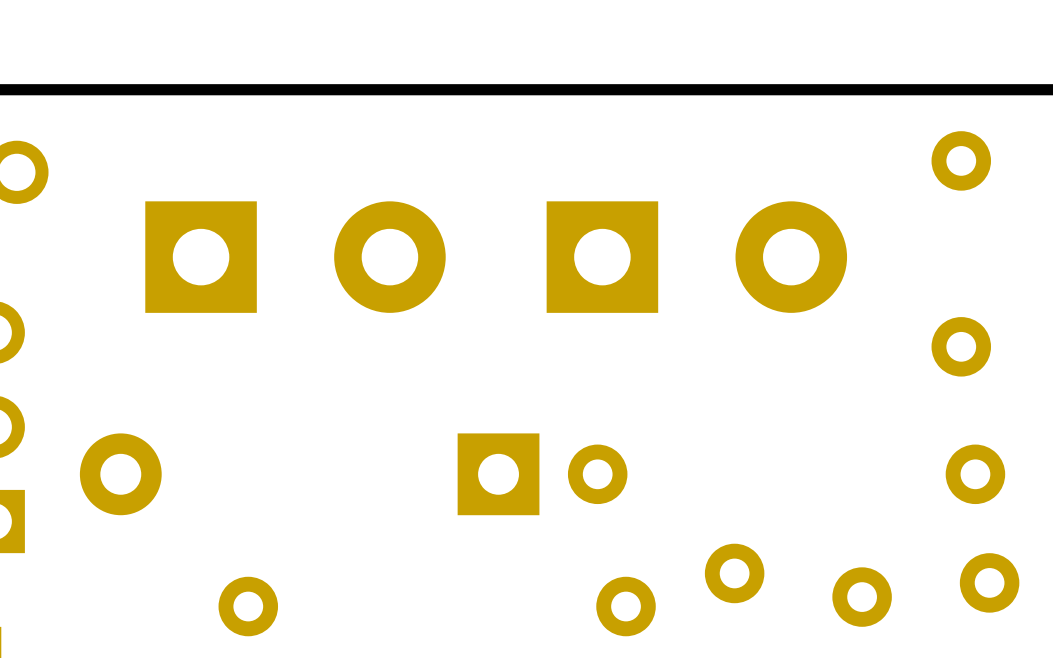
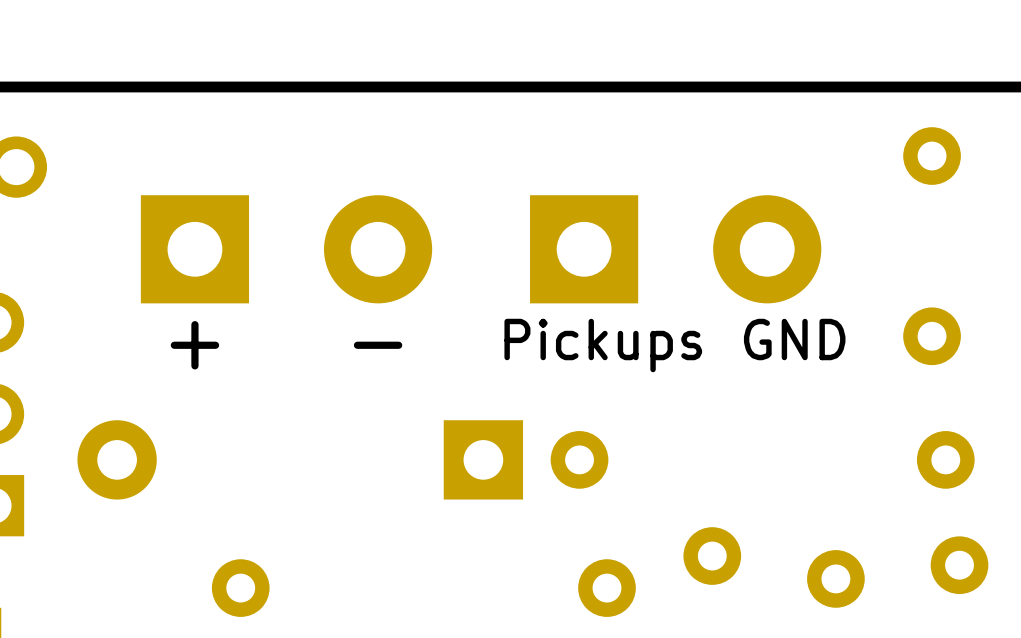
text: none -> GND (794, 339)
text: none -> + (194, 345)
text: none -> - (378, 345)
text: none -> Pickups (603, 345)

